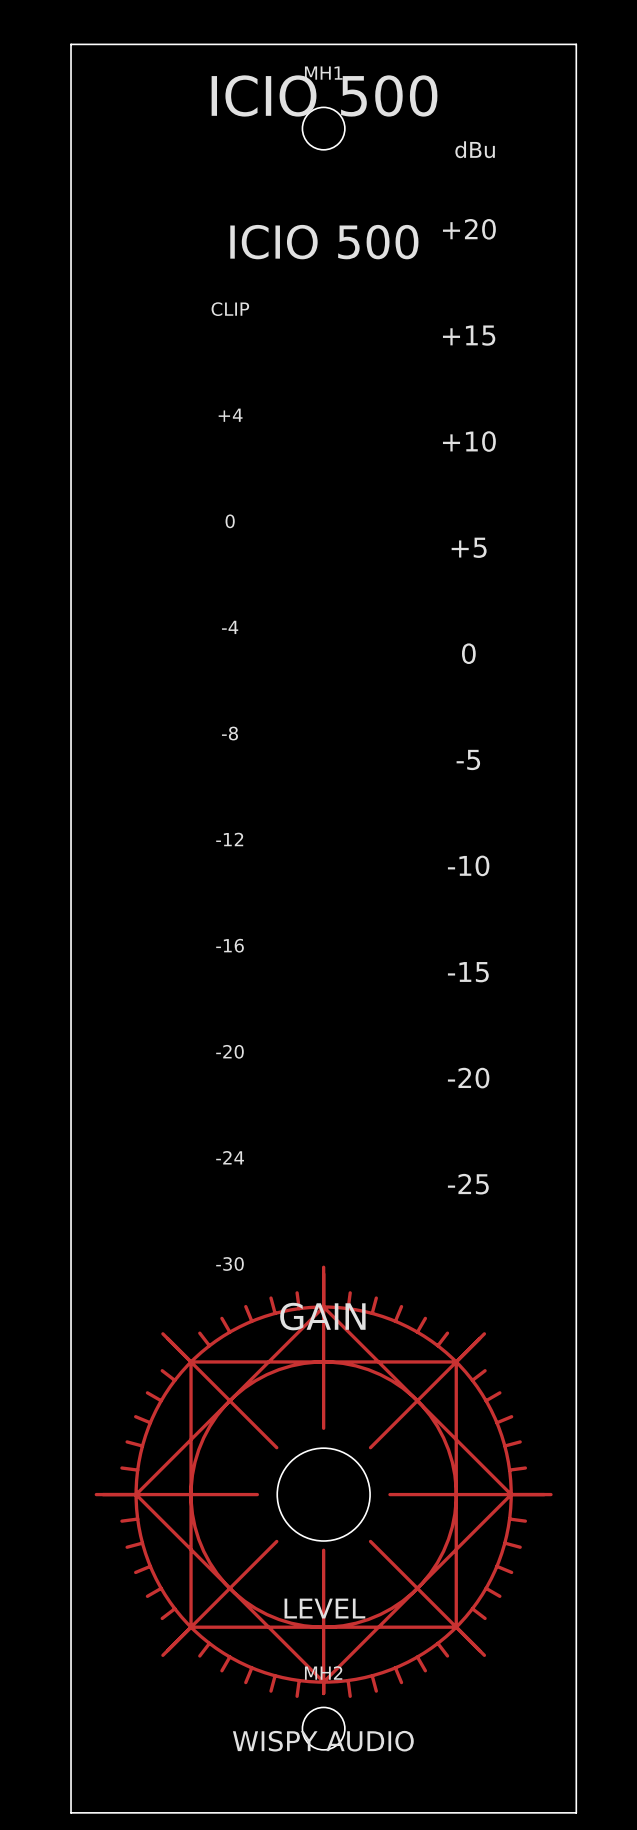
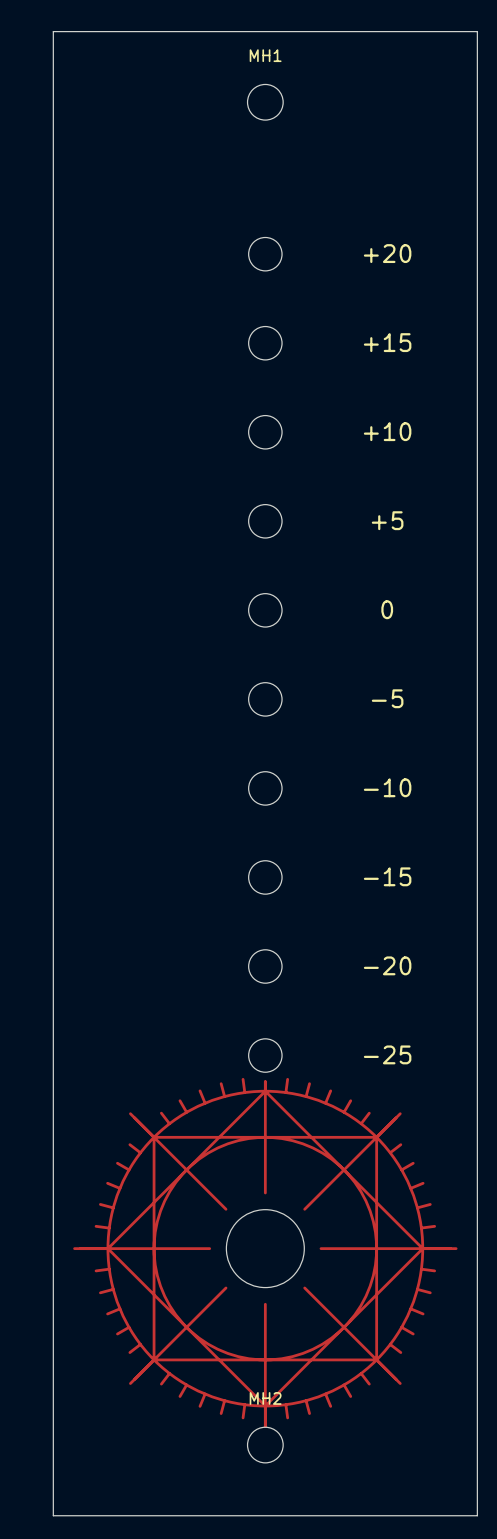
text: ICIO 500 (324, 95) -> none
text: dBu (475, 149) -> none
text position: +20 (469, 229) -> +20 (387, 253)
text: ICIO 500 (324, 242) -> none
round board edge: none -> [248, 236, 283, 272]
text: CLIP (230, 309) -> none
text position: +15 (469, 335) -> +15 (387, 342)
round board edge: none -> [248, 325, 283, 361]
text: +4 (230, 415) -> none
text position: +10 (469, 441) -> +10 (387, 431)
round board edge: none -> [248, 415, 283, 450]
text: 0 (230, 521) -> none
text position: +5 (469, 547) -> +5 (387, 520)
round board edge: none -> [248, 504, 283, 539]
text: -4 (230, 627) -> none
text position: 0 (468, 653) -> 0 (387, 609)
round board edge: none -> [248, 593, 283, 628]
text: -8 (229, 733) -> none
text position: -5 (468, 759) -> -5 (387, 698)
round board edge: none -> [248, 682, 283, 717]
text: -12 (229, 839) -> none
text position: -10 (468, 865) -> -10 (387, 787)
round board edge: none -> [248, 771, 283, 806]
text: -16 (230, 945) -> none
text position: -15 (468, 972) -> -15 (387, 876)
round board edge: none -> [248, 860, 283, 895]
text: -20 (229, 1051) -> none
text position: -20 (468, 1078) -> -20 (387, 965)
round board edge: none -> [248, 949, 283, 984]
text: -24 (230, 1157) -> none
text position: -25 (468, 1184) -> -25 (387, 1054)
round board edge: none -> [248, 1038, 283, 1073]
text: -30 (229, 1264) -> none
drawing: [94, 1265, 553, 1698] -> none
drawing: none -> [73, 1077, 458, 1441]
text: GAIN (322, 1316) -> none
text: LEVEL (324, 1608) -> none
text: WISPY AUDIO (323, 1741) -> none

